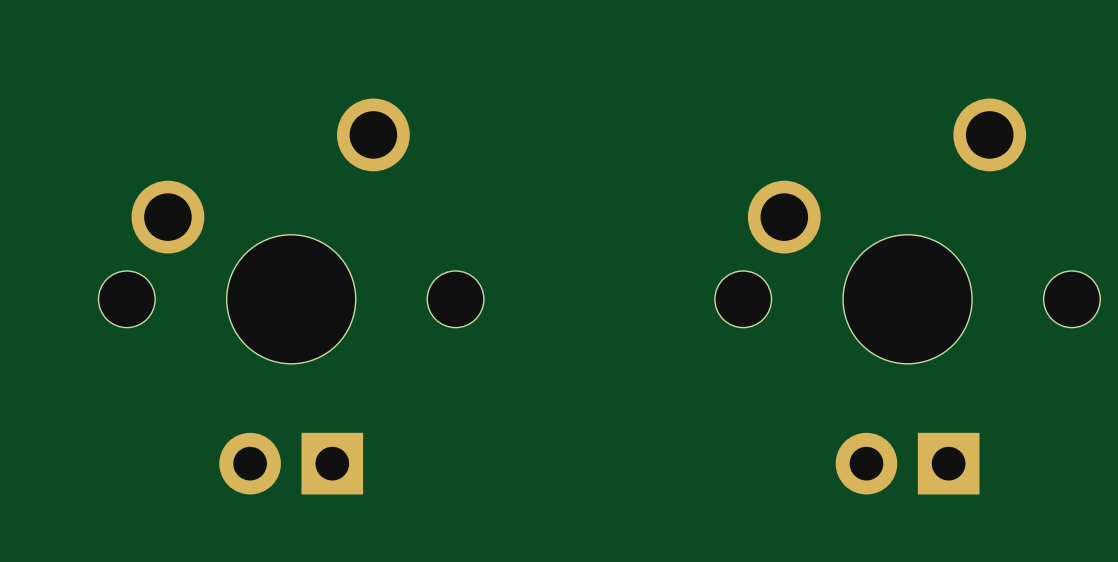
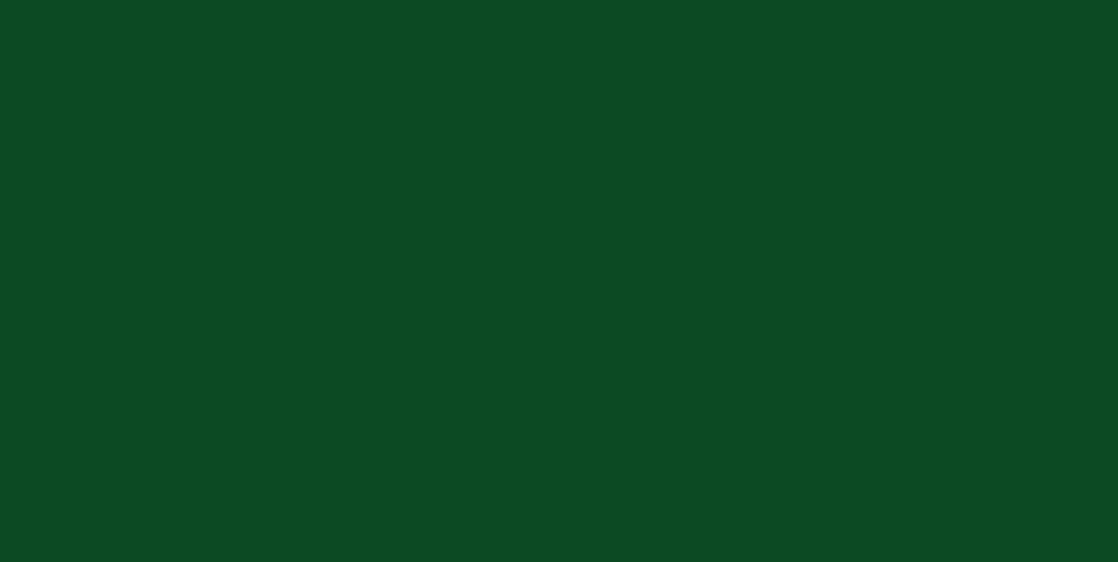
part: (291, 296) -> none
part: (907, 296) -> none

